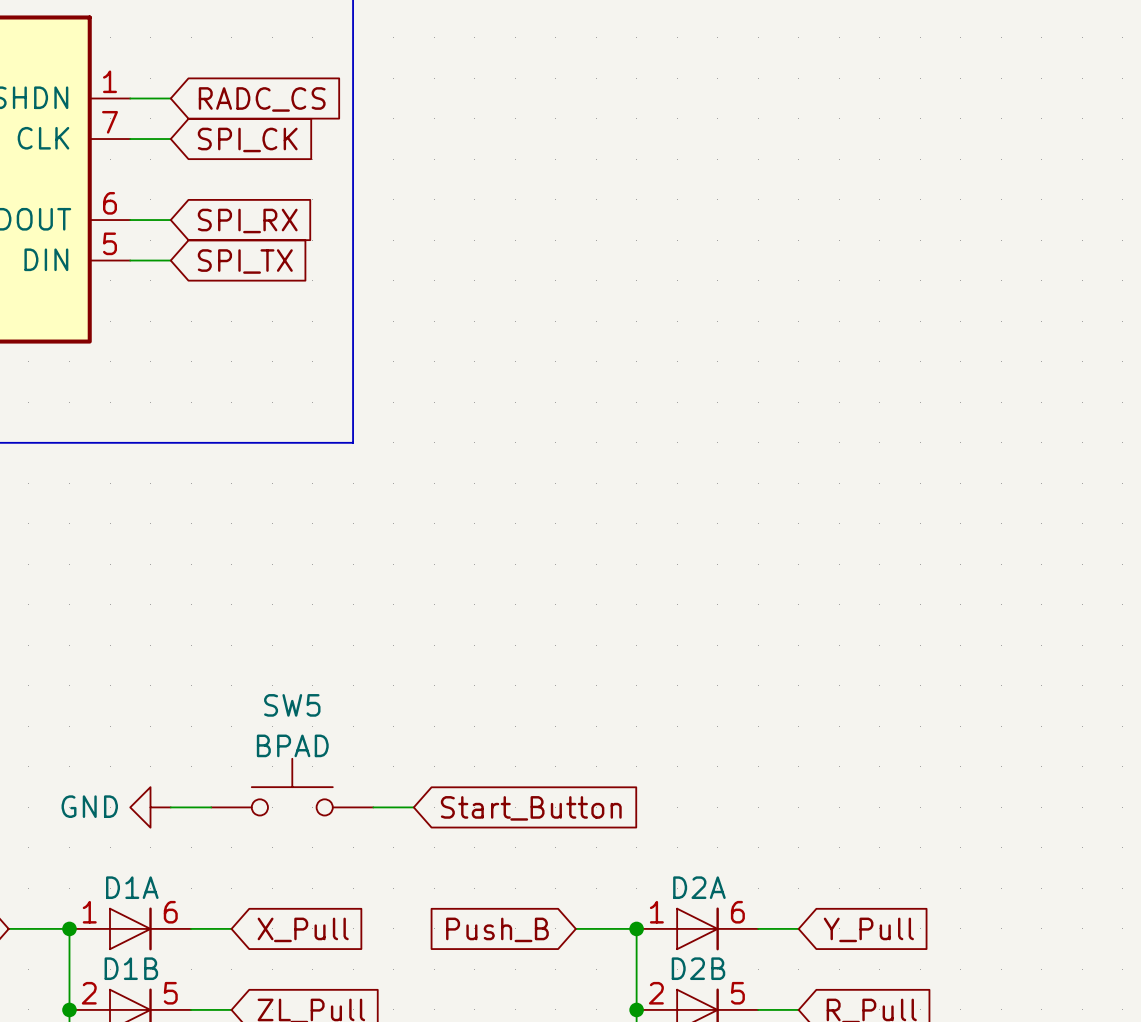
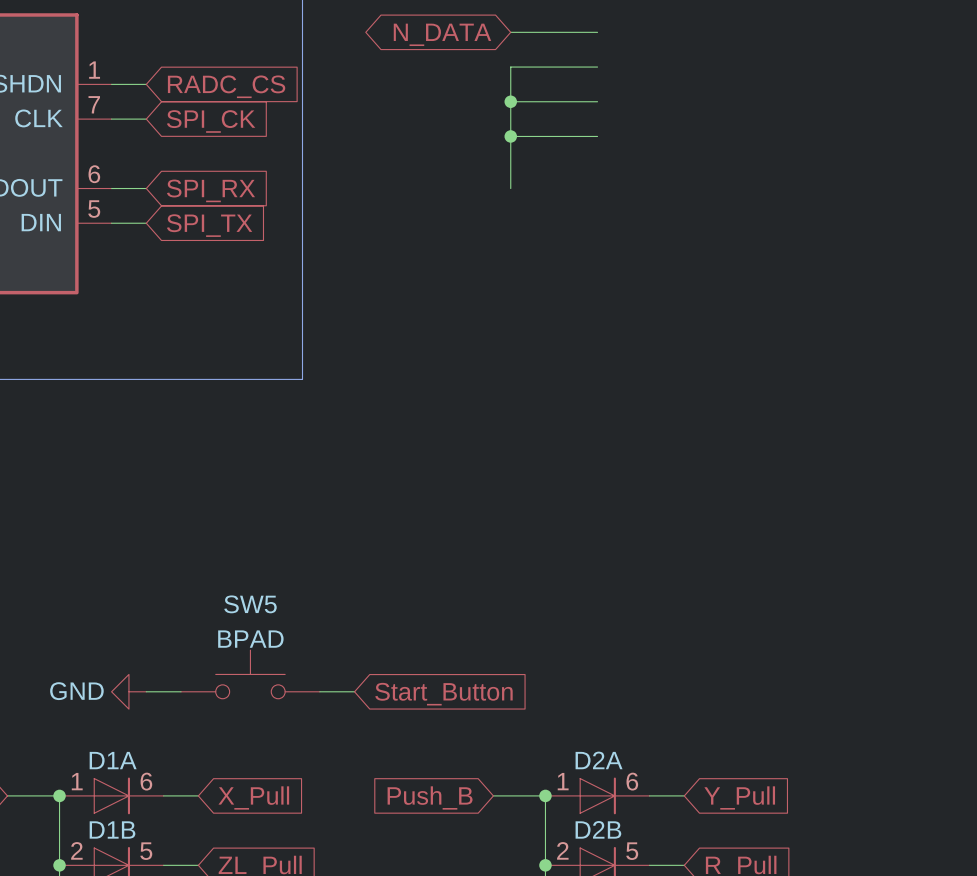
wire: none -> (510, 32) (597, 32)
global label: none -> N_DATA (442, 34)
wire: none -> (597, 67) (510, 67) (510, 188)
wire: none -> (510, 101) (597, 101)
junction: none -> (510, 101)
wire: none -> (510, 136) (597, 136)
junction: none -> (510, 136)

